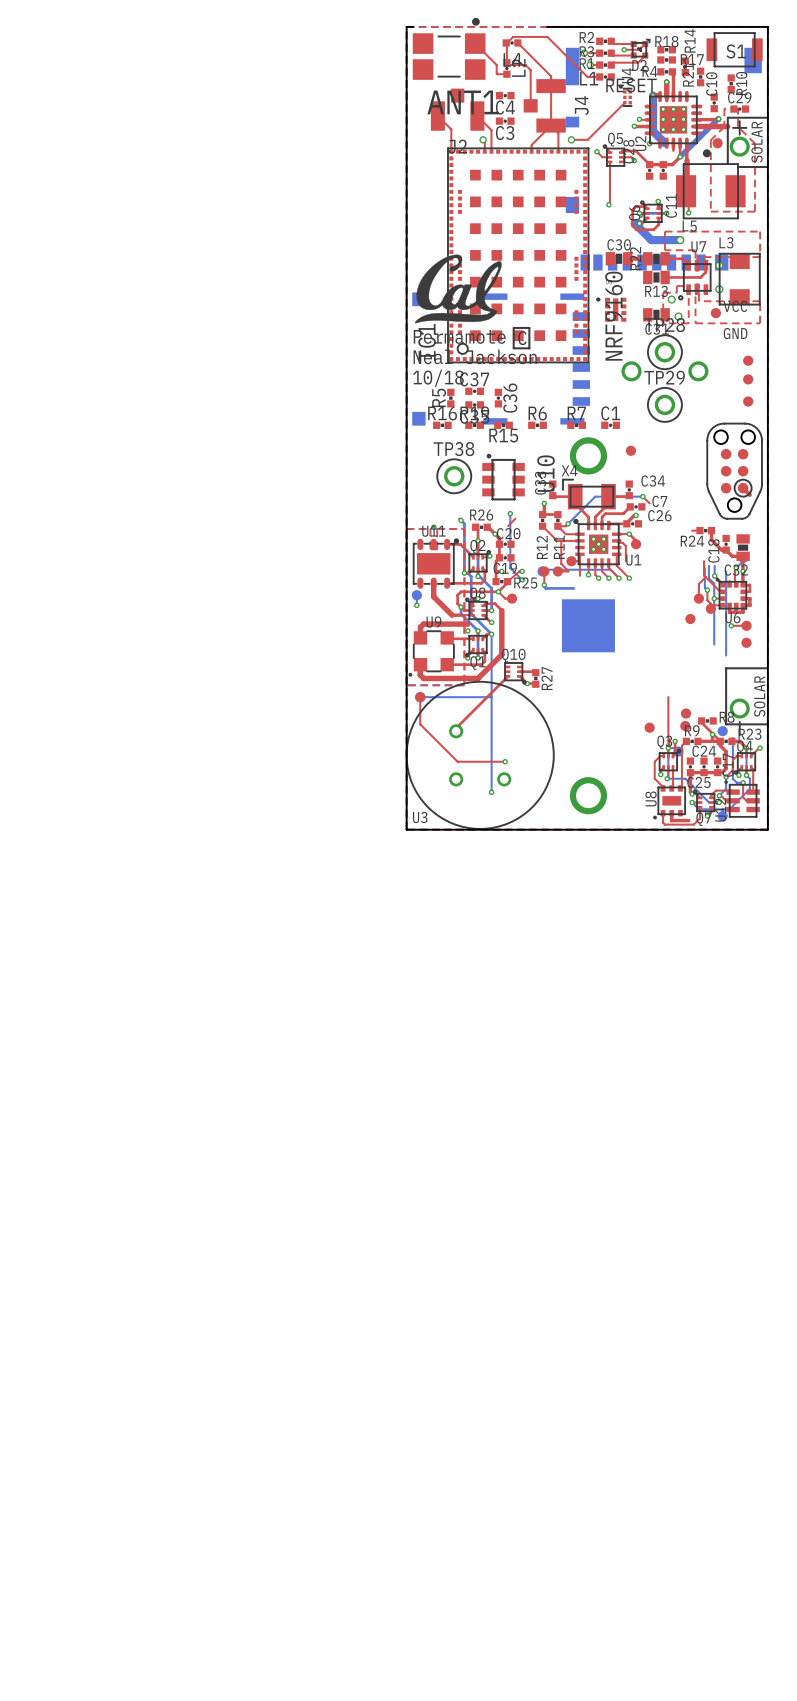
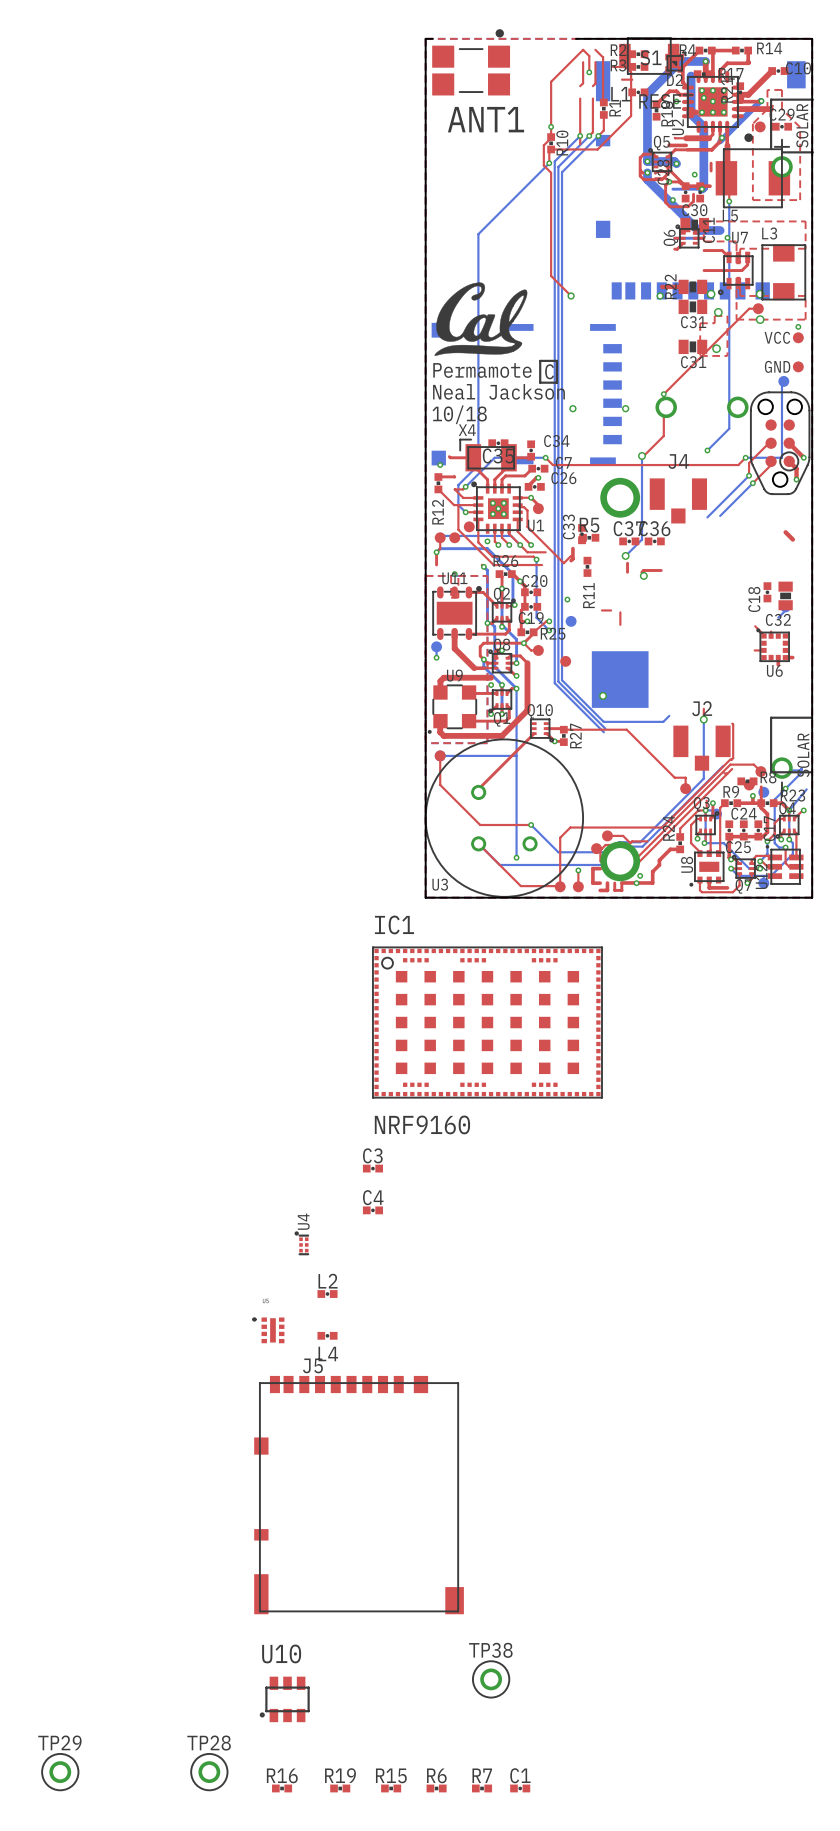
top track: none -> (595, 49) (603, 57) (603, 102)
top track: none -> (699, 50) (682, 67) (682, 82) (688, 87)
top track: none -> (711, 50) (735, 50)
top track: none -> (712, 50) (712, 77)
top track: none -> (748, 50) (748, 63) (727, 63) (720, 70) (720, 77)
top track: (611, 41) (613, 43) (633, 43) -> none
L4 position: (512, 42) -> (327, 1335)
top track: (517, 42) (551, 76) (551, 82) -> none
top track: none -> (624, 56) (624, 66) (631, 72) (631, 116) (597, 149) (551, 149) (549, 151) (549, 163)
top track: (475, 43) (496, 65) (497, 74) (506, 74) -> none
top track: (645, 43) (639, 49) (624, 49) -> none
top track: none -> (583, 62) (583, 83) (580, 86)
top track: none -> (595, 62) (595, 83) (592, 86)
bottom track: none -> (705, 61) (680, 61) (647, 94) (647, 161) (674, 161) (676, 163)
via: none -> (705, 61)
via: (624, 49) -> none
R18 rotation: 0° (666, 49) -> 90° clockwise (656, 110)
R18 position: (666, 49) -> (656, 110)
S1 position: (734, 49) -> (649, 56)
via: (584, 53) -> none
top track: (611, 53) (613, 55) (633, 55) -> none
top track: (645, 55) (638, 62) (613, 62) (611, 65) -> none
top track: none -> (772, 71) (748, 94) (737, 94)
top track: none -> (589, 72) (589, 56) (583, 49) (551, 81) (551, 138) (543, 145) (543, 165) (551, 172) (551, 275) (571, 295)
via: none -> (589, 72)
bottom track: none -> (691, 76) (691, 114) (703, 126) (703, 187) (702, 189) (672, 189)
via: (590, 65) -> none
R1 rotation: 0° (605, 65) -> 90° clockwise (603, 108)
R1 position: (605, 65) -> (603, 108)
R14 rotation: 0° (685, 66) -> 90° clockwise (741, 50)
R14 position: (685, 66) -> (741, 50)
L2 rotation: 0° (506, 68) -> 90° clockwise (327, 1294)
L2 position: (506, 68) -> (327, 1294)
R4 position: (666, 71) -> (705, 50)
top track: (672, 71) (673, 96) -> none
via: none -> (702, 90)
via: none -> (712, 90)
via: none -> (723, 90)
top track: (599, 76) (587, 76) (547, 36) (513, 36) (506, 42) (506, 62) (509, 65) (525, 65) (530, 70) (530, 105) -> none
top track: none -> (688, 94) (669, 91) (656, 104)
top track: none -> (592, 98) (592, 132) (589, 136)
top track: (666, 82) (666, 96) -> (705, 61) (705, 77)
R10 position: (731, 83) -> (551, 143)
via: none -> (676, 101)
via: none -> (712, 101)
via: none -> (723, 101)
via: none -> (761, 101)
C4 position: (505, 95) -> (372, 1210)
U4 position: (625, 95) -> (301, 1243)
bottom track: (653, 95) (653, 131) (664, 143) -> none
via: (653, 95) -> none
via: none -> (702, 112)
via: none -> (712, 112)
via: none -> (723, 112)
top track: none -> (603, 114) (603, 130) (598, 136)
top track: (624, 102) (587, 139) (571, 139) -> none
C10 rotation: 0° (714, 102) -> 90° clockwise (778, 71)
C10 position: (714, 102) -> (778, 71)
J4 rotation: 0° (544, 105) -> 90° counterclockwise (678, 500)
J4 position: (544, 105) -> (678, 500)
C4 name position: C4 (505, 107) -> C4 (373, 1197)
top zone outline: (724, 108) (724, 126) (710, 140) (710, 211) (755, 211) (755, 143) (738, 126) (738, 108) (724, 108) -> (767, 89) (767, 109) (752, 123) (752, 200) (800, 200) (800, 127) (781, 109) (781, 89) (767, 89)
J2 rotation: 0° (457, 109) -> 180° (702, 748)
J2 position: (457, 109) -> (702, 748)
via: none -> (551, 126)
via: (663, 109) -> none
via: (673, 109) -> none
top track: none -> (712, 126) (712, 134) (709, 138) (686, 138)
top track: none -> (720, 126) (720, 141) (711, 149)
via: (683, 109) -> none
top track: (437, 116) (451, 129) (451, 151) -> none
top track: (477, 116) (491, 130) (491, 151) -> none
bottom track: none -> (580, 136) (554, 161) (554, 683) (603, 732)
via: none -> (580, 136)
bottom track: none -> (589, 136) (558, 166) (558, 681) (605, 728)
via: none -> (589, 136)
bottom track: none -> (598, 136) (562, 172) (562, 680) (603, 721) (663, 721) (669, 715)
via: none -> (598, 136)
line: (766, 117) (727, 117) (727, 163) -> (812, 99) (771, 99) (771, 148)
via: (639, 119) -> none
via: (663, 119) -> none
via: (673, 119) -> none
top track: (718, 119) (696, 119) -> (761, 101) (737, 101)
bottom track: (718, 119) (680, 156) -> (761, 101) (720, 141)
via: (718, 119) -> none
C3 position: (505, 121) -> (372, 1168)
U2 position: (677, 124) -> (717, 106)
via: (634, 126) -> none
top track: (696, 126) (727, 126) -> (737, 109) (770, 109)
via: (663, 129) -> none
via: (673, 129) -> none
via: (683, 129) -> none
top track: none -> (711, 149) (675, 149) (668, 156)
C3 name position: C3 (505, 133) -> C3 (372, 1155)
top track: none -> (655, 156) (653, 154) (643, 154) (640, 157) (640, 176) (643, 179) (662, 179) (668, 173) (668, 166)
top track: (483, 139) (484, 151) -> none
via: (483, 139) -> none
via: (571, 139) -> none
via: none -> (647, 161)
text position: SOLAR (757, 142) -> SOLAR (802, 125)
bottom track: none -> (549, 163) (478, 234) (478, 465) (458, 485) (458, 505) (465, 512)
via: none -> (549, 163)
via: none -> (676, 163)
via: (649, 143) -> none
top track: (680, 143) (680, 156) (672, 164) (663, 164) -> none
top track: (686, 143) (687, 190) (684, 192) (688, 196) (688, 212) -> (727, 126) (727, 177) (724, 179) (729, 184) (729, 201)
part position: (717, 143) -> (760, 126)
top track: (531, 151) (531, 145) (551, 125) (558, 132) (558, 151) -> none
top track: (596, 151) (602, 157) (609, 157) -> none
via: (596, 151) -> none
bottom track: none -> (647, 172) (647, 179) (698, 230) (720, 230)
via: none -> (647, 172)
via: none -> (694, 174)
Q5 position: (613, 155) -> (660, 160)
via: (680, 156) -> none
top track: (609, 161) (608, 204) -> none
via: none -> (702, 189)
line: (738, 167) (766, 167) -> (782, 152) (812, 152)
via: none -> (672, 200)
bottom track: none -> (729, 201) (729, 428) (707, 450)
via: none -> (729, 201)
L5 position: (710, 191) -> (752, 178)
via: (658, 201) -> none
via: (608, 204) -> none
top track: (647, 208) (645, 206) (636, 206) (632, 209) (632, 225) (636, 229) (653, 229) (658, 224) (658, 218) -> (681, 184) (679, 181) (669, 181) (665, 185) (665, 202) (669, 206) (688, 206) (693, 201) (693, 194)
via: (639, 213) -> none
via: (666, 213) -> none
bottom track: (639, 223) (634, 223) (651, 240) (680, 240) -> none
via: (639, 223) -> none
top zone outline: (664, 231) (664, 250) (695, 250) (695, 270) (698, 270) (698, 257) (760, 257) (760, 231) (664, 231) -> (703, 221) (703, 241) (736, 241) (736, 263) (740, 263) (740, 248) (805, 248) (805, 221) (703, 221)
via: (680, 240) -> none
IC1 rotation: 0° (518, 255) -> 90° clockwise (487, 1022)
IC1 position: (518, 255) -> (487, 1022)
C30 position: (619, 258) -> (694, 225)
top track: (665, 258) (682, 258) (688, 265) -> (704, 250) (722, 250) (729, 257)
via: none -> (711, 294)
top track: (705, 265) (705, 272) (700, 277) (665, 277) -> (747, 257) (747, 264) (741, 270) (704, 270)
via: none -> (571, 295)
via: none -> (660, 295)
top track: none -> (758, 308) (749, 308) (663, 394) (663, 435) (642, 455)
part: none -> (758, 308)
L3 position: (739, 279) -> (783, 272)
U7 position: (694, 280) -> (735, 273)
via: none -> (718, 312)
top zone outline: (695, 284) (695, 323) (760, 323) (760, 301) (698, 301) (698, 284) (695, 284) -> (736, 277) (736, 319) (805, 319) (805, 295) (740, 295) (740, 277) (736, 277)
R13 name: R13 (656, 291) -> C31 (693, 322)
via: none -> (798, 326)
via: (671, 299) -> none
part: none -> (798, 337)
part position: (611, 309) -> (268, 1330)
part: (715, 313) -> none
part: none -> (798, 366)
bottom track: none -> (783, 381) (781, 383) (781, 457) (745, 457)
part: none -> (783, 381)
TP28 position: (664, 352) -> (209, 1772)
via: none -> (663, 394)
part: (748, 360) -> none
via: none -> (572, 408)
via: none -> (625, 408)
part: (748, 379) -> none
C37 position: (474, 391) -> (629, 541)
part footprint: [743, 396, 754, 407] -> [749, 391, 811, 496]
R5 rotation: 0° (450, 398) -> 90° clockwise (589, 537)
R5 position: (450, 398) -> (589, 537)
C36 rotation: 0° (498, 398) -> 90° clockwise (654, 541)
C36 position: (498, 398) -> (654, 541)
TP29 position: (664, 404) -> (60, 1772)
top track: none -> (771, 443) (749, 463) (749, 475)
top track: none -> (789, 443) (803, 457)
via: none -> (707, 450)
bottom track: none -> (642, 455) (642, 539) (625, 555)
via: none -> (642, 455)
top track: none -> (531, 456) (508, 457) (509, 468) (505, 468) (494, 479) (494, 488)
top track: none -> (545, 457) (552, 465) (738, 465) (745, 457)
via: none -> (545, 457)
via: none -> (745, 457)
via: none -> (803, 457)
top track: none -> (771, 461) (771, 465) (752, 483)
top track: none -> (789, 461) (796, 468) (796, 479)
via: none -> (440, 465)
R16 position: (442, 425) -> (282, 1788)
R19 position: (474, 425) -> (340, 1788)
R15 position: (503, 425) -> (391, 1788)
R6 position: (537, 425) -> (436, 1788)
R7 position: (576, 425) -> (482, 1788)
C1 position: (610, 425) -> (520, 1788)
R15 name position: R15 (503, 435) -> R15 (391, 1775)
bottom track: none -> (749, 475) (707, 517)
via: none -> (749, 475)
via: none -> (538, 477)
via: none -> (796, 479)
bottom track: none -> (752, 483) (720, 515)
via: none -> (752, 483)
via: none -> (465, 486)
part: (630, 450) -> none
via: none -> (531, 497)
via: none -> (492, 503)
via: none -> (503, 503)
top track: none -> (517, 505) (527, 510) (527, 526) (563, 563) (571, 555)
via: none -> (498, 508)
part: none -> (538, 508)
top track: none -> (465, 512) (478, 512)
via: none -> (465, 512)
via: none -> (492, 514)
via: none -> (503, 514)
part: (734, 471) -> none
TP38 position: (454, 476) -> (491, 1679)
top track: none -> (478, 519) (478, 542) (492, 556) (533, 556) (536, 559)
U10 rotation: 0° (503, 477) -> 90° counterclockwise (284, 1699)
U10 position: (503, 477) -> (284, 1699)
part: none -> (469, 526)
top track: none -> (509, 528) (509, 533) (527, 552) (545, 552)
C34 position: (629, 489) -> (531, 450)
top track: none -> (440, 537) (440, 548) (436, 552) (436, 564)
part: none -> (440, 537)
part: none -> (454, 537)
X4 position: (588, 494) -> (488, 455)
top track: (552, 495) (575, 496) (575, 503) (588, 517) (588, 525) -> (449, 456) (473, 457) (473, 465) (487, 479) (487, 488)
top track: (629, 495) (608, 496) (608, 506) (605, 506) (595, 517) -> none
via: none -> (487, 541)
top track: (642, 496) (649, 503) -> none
bottom track: (642, 496) (595, 496) (568, 523) -> (545, 457) (494, 457) (465, 486)
via: (642, 496) -> none
via: none -> (498, 545)
via: none -> (509, 545)
via: none -> (520, 545)
via: none -> (531, 545)
via: (544, 503) -> none
bottom track: none -> (436, 552) (440, 548) (487, 548) (512, 574) (512, 603) (514, 605)
via: none -> (436, 552)
top track: (630, 506) (623, 513) (605, 513) (602, 517) (602, 525) -> (532, 468) (524, 475) (505, 475) (502, 479) (502, 488)
C7 position: (636, 506) -> (538, 468)
via: none -> (625, 555)
top track: (542, 514) (557, 514) -> (438, 476) (454, 477)
top track: (636, 515) (625, 523) -> (538, 477) (527, 486)
via: (636, 515) -> none
top track: (515, 518) (508, 526) -> (542, 565) (493, 565) (458, 529) (458, 505)
R12 position: (542, 520) -> (438, 483)
top track: (568, 523) (565, 526) (557, 526) (565, 534) (579, 534) -> (465, 486) (463, 489) (454, 489) (463, 497) (478, 497)
via: (568, 523) -> none
C26 position: (632, 523) -> (534, 486)
top track: (542, 526) (557, 540) (579, 540) -> (438, 489) (454, 505) (478, 505)
via: none -> (643, 575)
top track: (692, 530) (699, 530) -> none
R24 rotation: 0° (705, 530) -> 90° clockwise (680, 843)
R24 position: (705, 530) -> (680, 843)
top track: (711, 530) (711, 539) (721, 550) (726, 550) (732, 556) (743, 556) -> none
top track: (616, 534) (629, 534) (636, 540) (636, 544) -> (517, 497) (531, 497) (538, 505) (538, 508)
via: (629, 534) -> none
via: (593, 539) -> none
via: (603, 539) -> none
top track: (561, 540) (561, 563) (568, 571) (557, 571) -> none
top track: (616, 540) (625, 546) (625, 561) -> none
U1 position: (597, 543) -> (496, 507)
via: (598, 544) -> none
part: (636, 544) -> none
via: (593, 549) -> none
via: (603, 549) -> none
via: none -> (567, 599)
top track: (579, 554) (579, 575) -> none
top track: (616, 554) (616, 565) (629, 578) -> (517, 519) (517, 531) (531, 545)
top track: (742, 556) (742, 585) (749, 585) -> none
part: (571, 561) -> none
top track: (704, 561) (704, 575) (719, 590) (722, 591) -> none
top track: (595, 562) (595, 574) (598, 578) -> (494, 528) (494, 541) (498, 545)
top track: (602, 562) (602, 571) (608, 578) -> (501, 528) (501, 537) (509, 545)
top track: (608, 562) (608, 567) (619, 578) -> none
bottom track: (708, 565) (708, 578) (714, 583) (714, 644) -> none
bottom track: (714, 565) (714, 576) -> none
bottom track: (704, 568) (704, 587) (707, 590) -> none
top track: (736, 568) (736, 585) -> none
via: (736, 568) -> none
bottom track: (542, 571) (544, 569) (610, 569) (619, 578) -> (438, 537) (440, 535) (511, 535) (520, 545)
top track: (544, 571) (544, 585) -> none
part: (544, 571) -> none
part: (557, 571) -> none
bottom track: (726, 571) (726, 655) -> none
via: (743, 571) -> none
via: (588, 574) -> none
via: (714, 576) -> none
top track: (705, 577) (698, 584) (698, 598) -> none
via: (598, 578) -> none
via: (608, 578) -> none
via: (619, 578) -> none
via: (629, 578) -> none
bottom track: (544, 585) (546, 588) (573, 588) -> none
via: (544, 585) -> none
top track: (749, 585) (749, 591) (743, 591) -> (607, 883) (607, 890) (600, 890)
top track: (707, 590) (707, 600) (712, 605) (722, 605) -> none
via: (707, 590) -> none
part: (698, 598) -> none
via: (714, 598) -> none
top track: (743, 598) (749, 598) (749, 605) -> none
top track: (729, 605) (729, 612) (743, 612) (743, 605) -> none
part: none -> (565, 661)
part: (710, 608) -> none
part: (690, 619) -> none
top track: (731, 625) (746, 625) -> none
via: (731, 625) -> none
part: (746, 625) -> none
via: none -> (603, 695)
part: (746, 642) -> none
top track: none -> (703, 708) (703, 719)
line: none -> (811, 717) (771, 717) (771, 772) (811, 772)
bottom track: none -> (703, 719) (703, 778) (640, 842) (619, 842) (616, 844)
via: none -> (703, 719)
top track: none -> (732, 723) (733, 758) (662, 827) (570, 827) (560, 837) (560, 886) (520, 886) (478, 843)
line: (766, 668) (726, 668) (726, 724) (766, 724) -> none
top track: none -> (563, 729) (626, 729) (674, 777) (685, 777) (685, 788)
top track: (668, 697) (668, 748) -> (680, 836) (680, 828) (698, 810) (705, 810)
bottom track: none -> (723, 766) (642, 846) (629, 846) (623, 852) (558, 852) (531, 824)
top track: none -> (732, 769) (626, 874)
bottom track: none -> (791, 770) (801, 768) (801, 772) (774, 799)
part: none -> (760, 771)
top track: none -> (763, 771) (760, 771) (753, 764) (730, 764) (626, 868) (621, 868)
part: (686, 713) -> none
top track: (701, 720) (720, 741) -> (761, 786) (761, 803)
part: none -> (749, 784)
part: (685, 726) -> none
via: none -> (785, 788)
bottom track: none -> (806, 789) (789, 810)
top track: none -> (607, 835) (623, 835) (630, 843)
part: none -> (607, 835)
top track: none -> (647, 841) (632, 841) (616, 857) (614, 861)
bottom track: none -> (478, 843) (499, 864) (636, 864)
top track: none -> (616, 844) (605, 844) (600, 850) (600, 861)
part: none -> (596, 848)
top track: none -> (680, 849) (670, 849) (659, 860) (659, 864) (652, 871) (652, 883)
top track: none -> (600, 868) (592, 868) (592, 883) (600, 883)
top track: none -> (578, 870) (578, 886)
via: none -> (578, 870)
via: none -> (640, 875)
top track: none -> (652, 882) (621, 882) (621, 890)
top track: none -> (614, 883) (614, 890) (622, 890)
via: none -> (636, 883)
part: none -> (560, 886)
part: none -> (578, 886)
J5: none -> (359, 1495)

